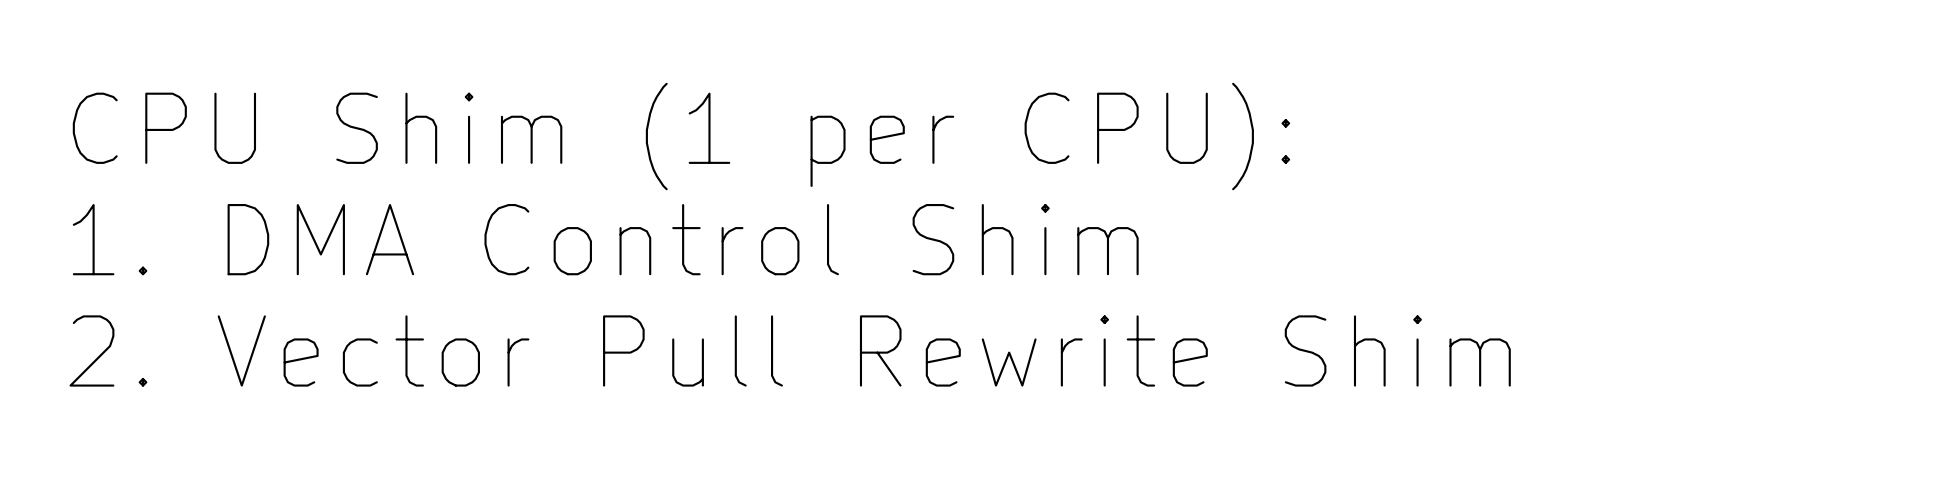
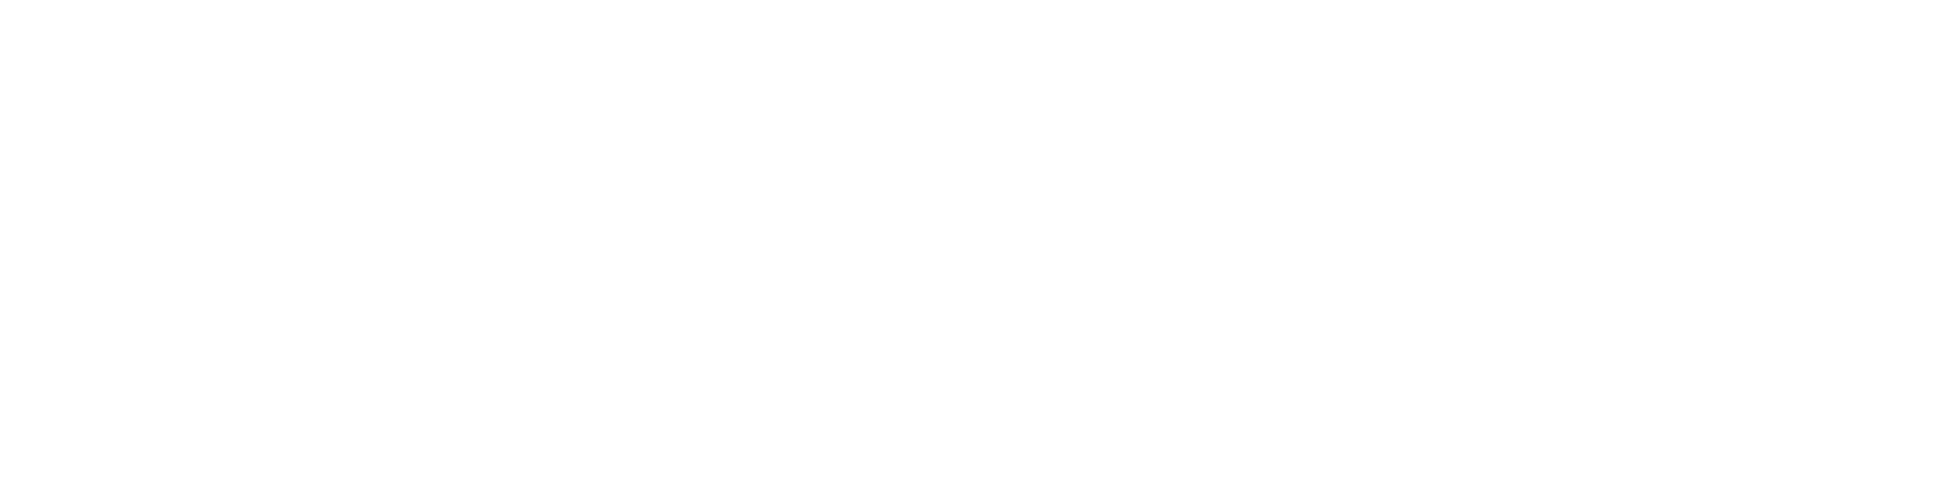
text: CPU Shim (1 per CPU): (681, 136) -> none
text: 1. DMA Control Shim (605, 239) -> none
text: 2. Vector Pull Rewrite Shim (790, 350) -> none

